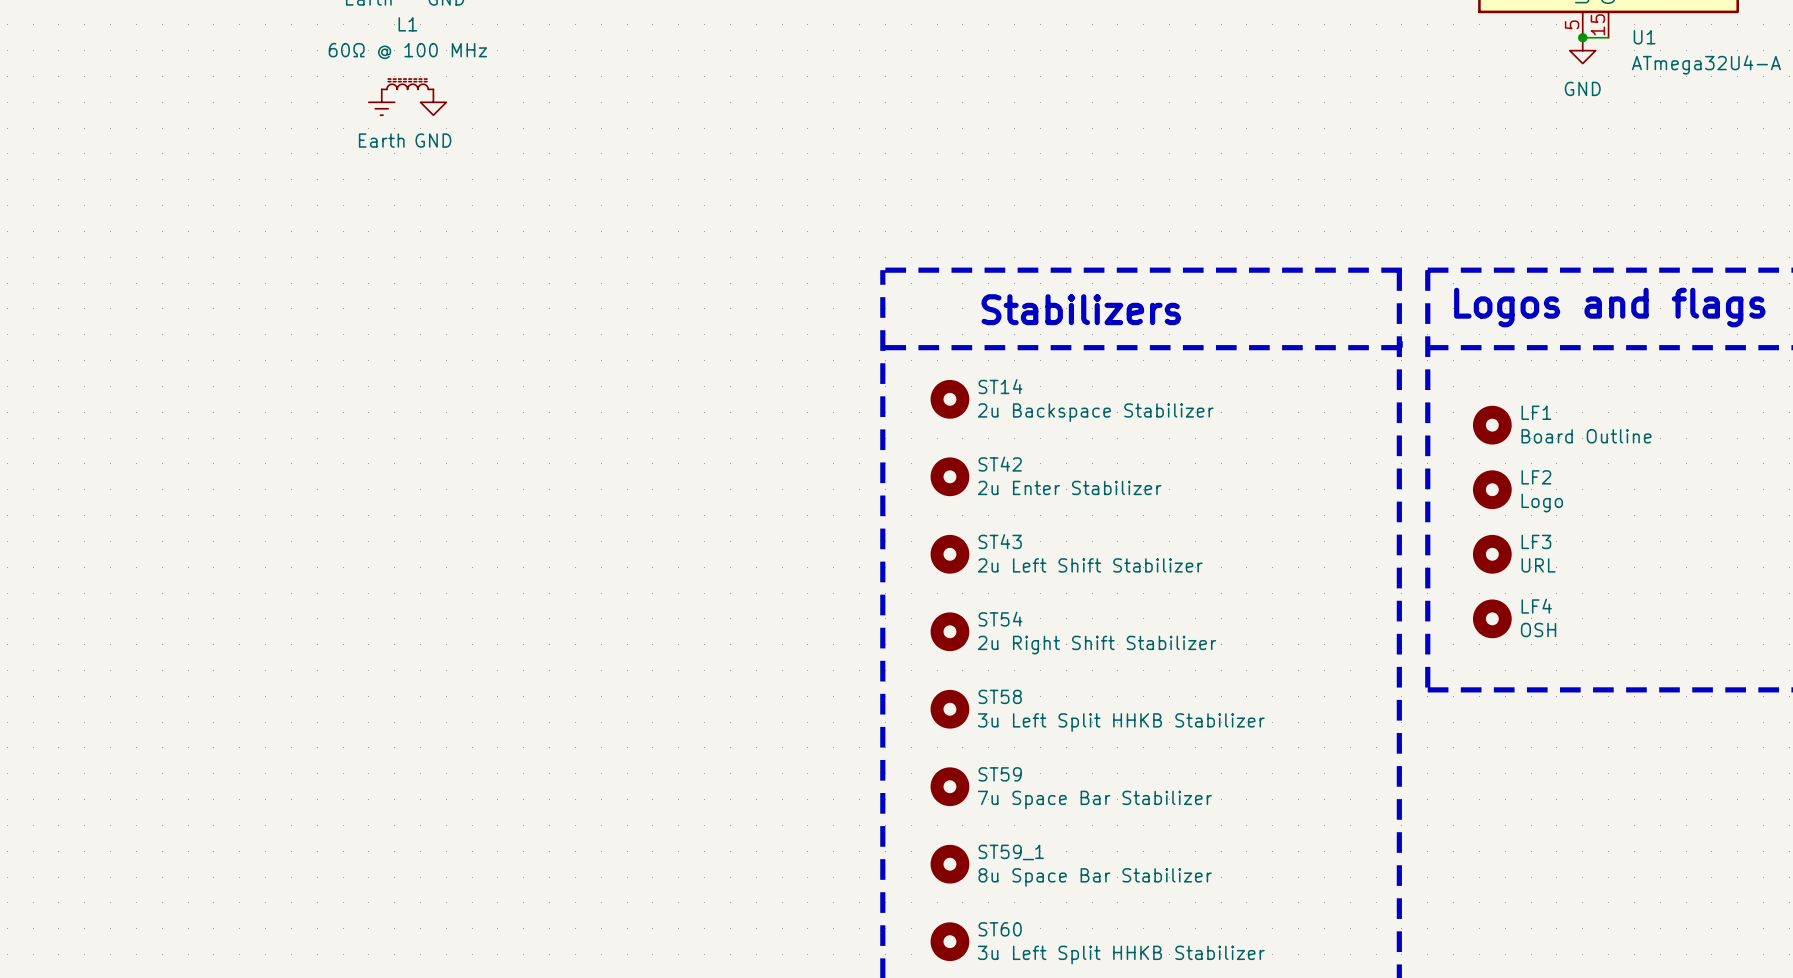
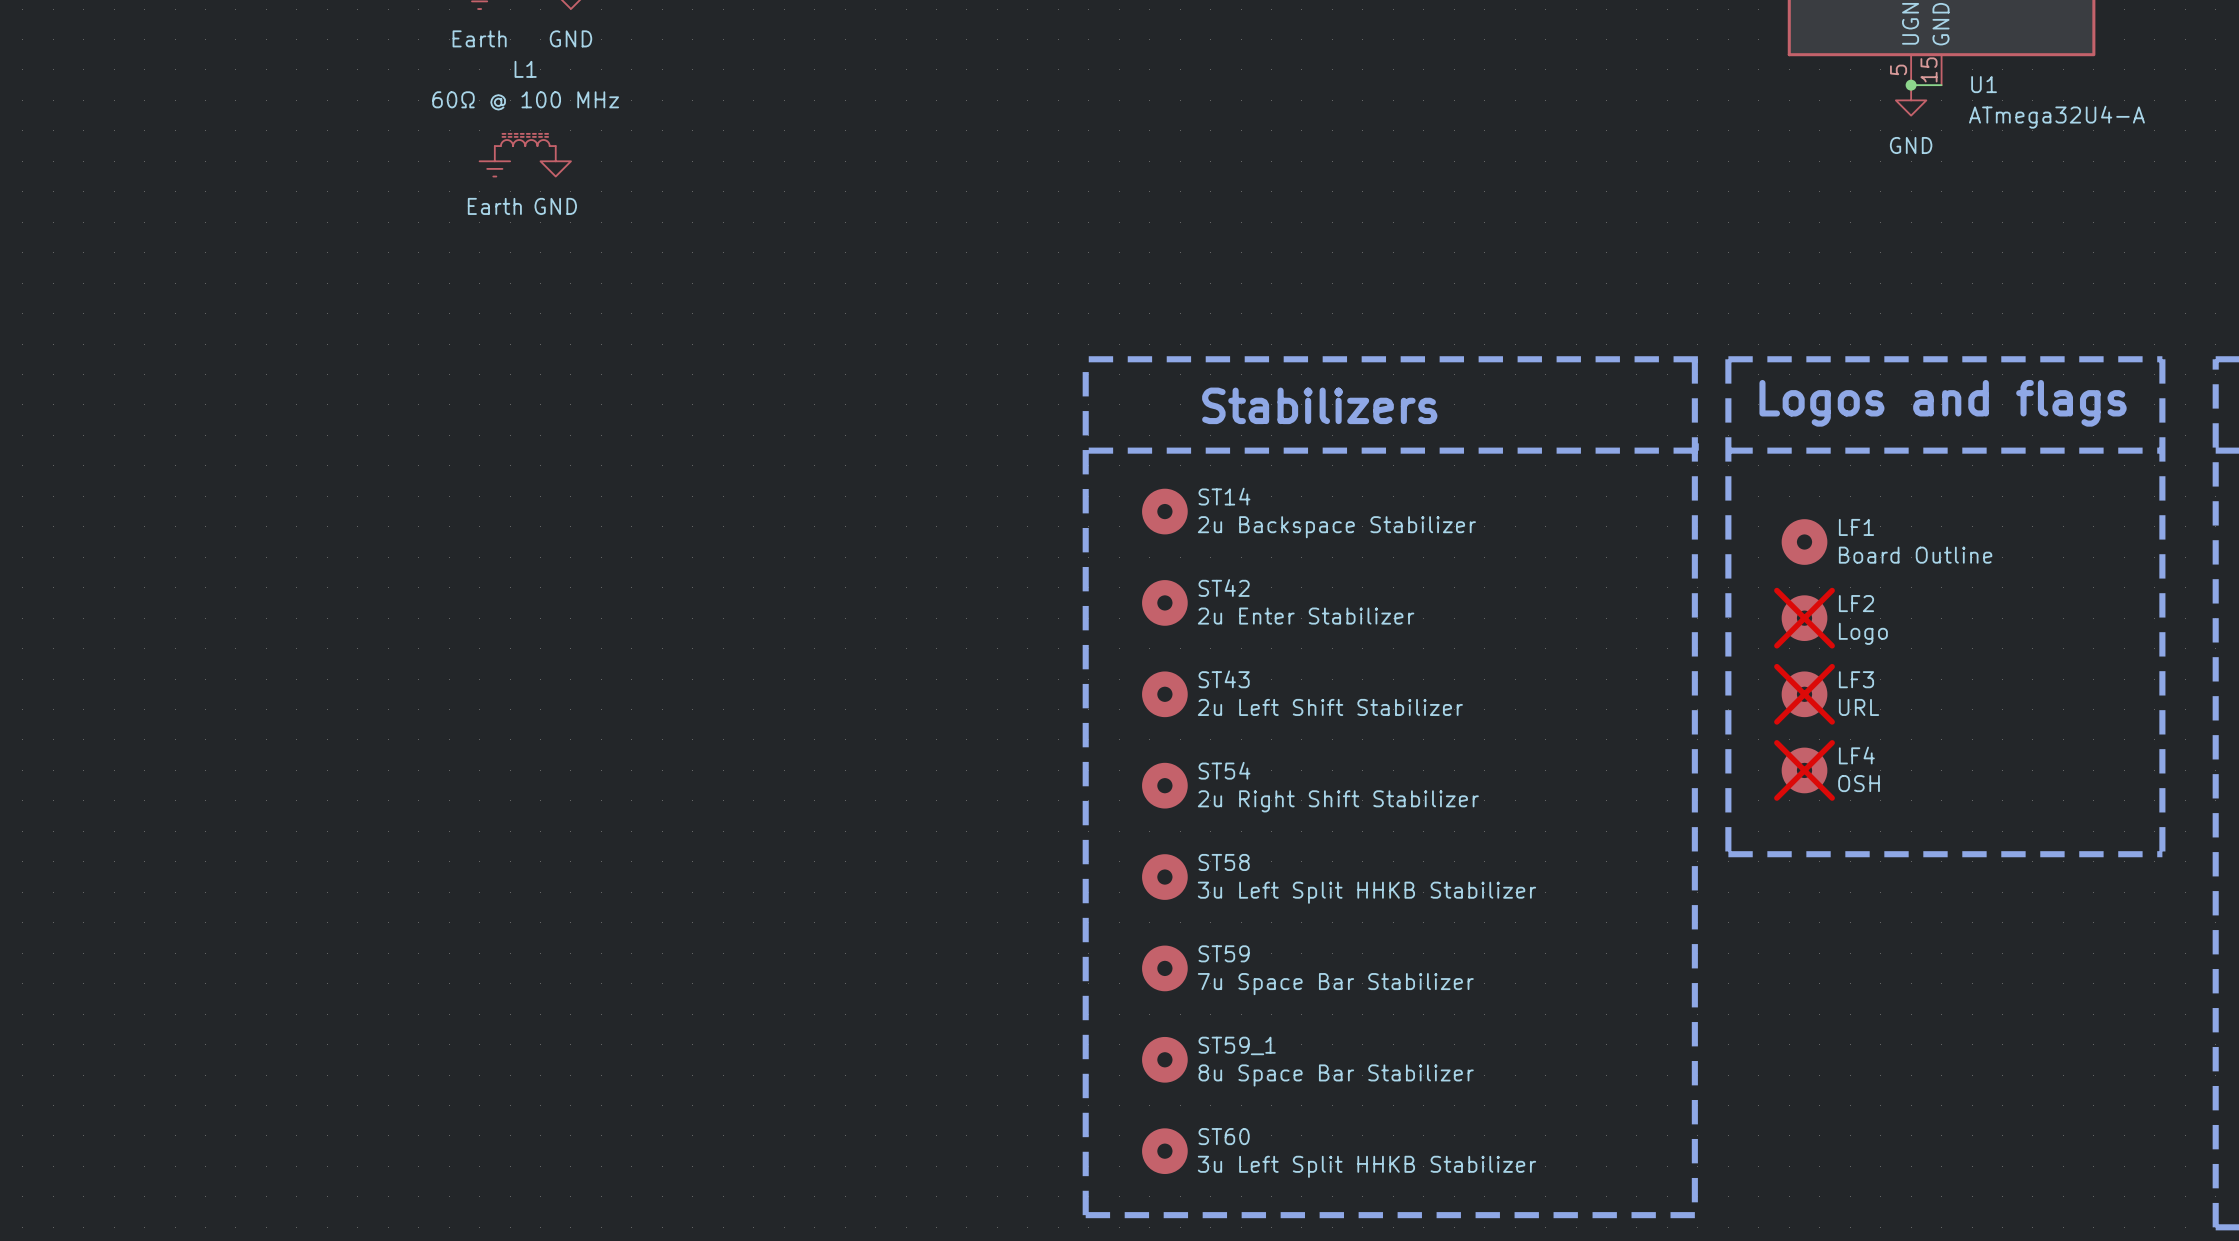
LF2 do-not-place cross: none -> (1804, 618)
LF3 do-not-place cross: none -> (1804, 694)
LF4 do-not-place cross: none -> (1804, 770)

